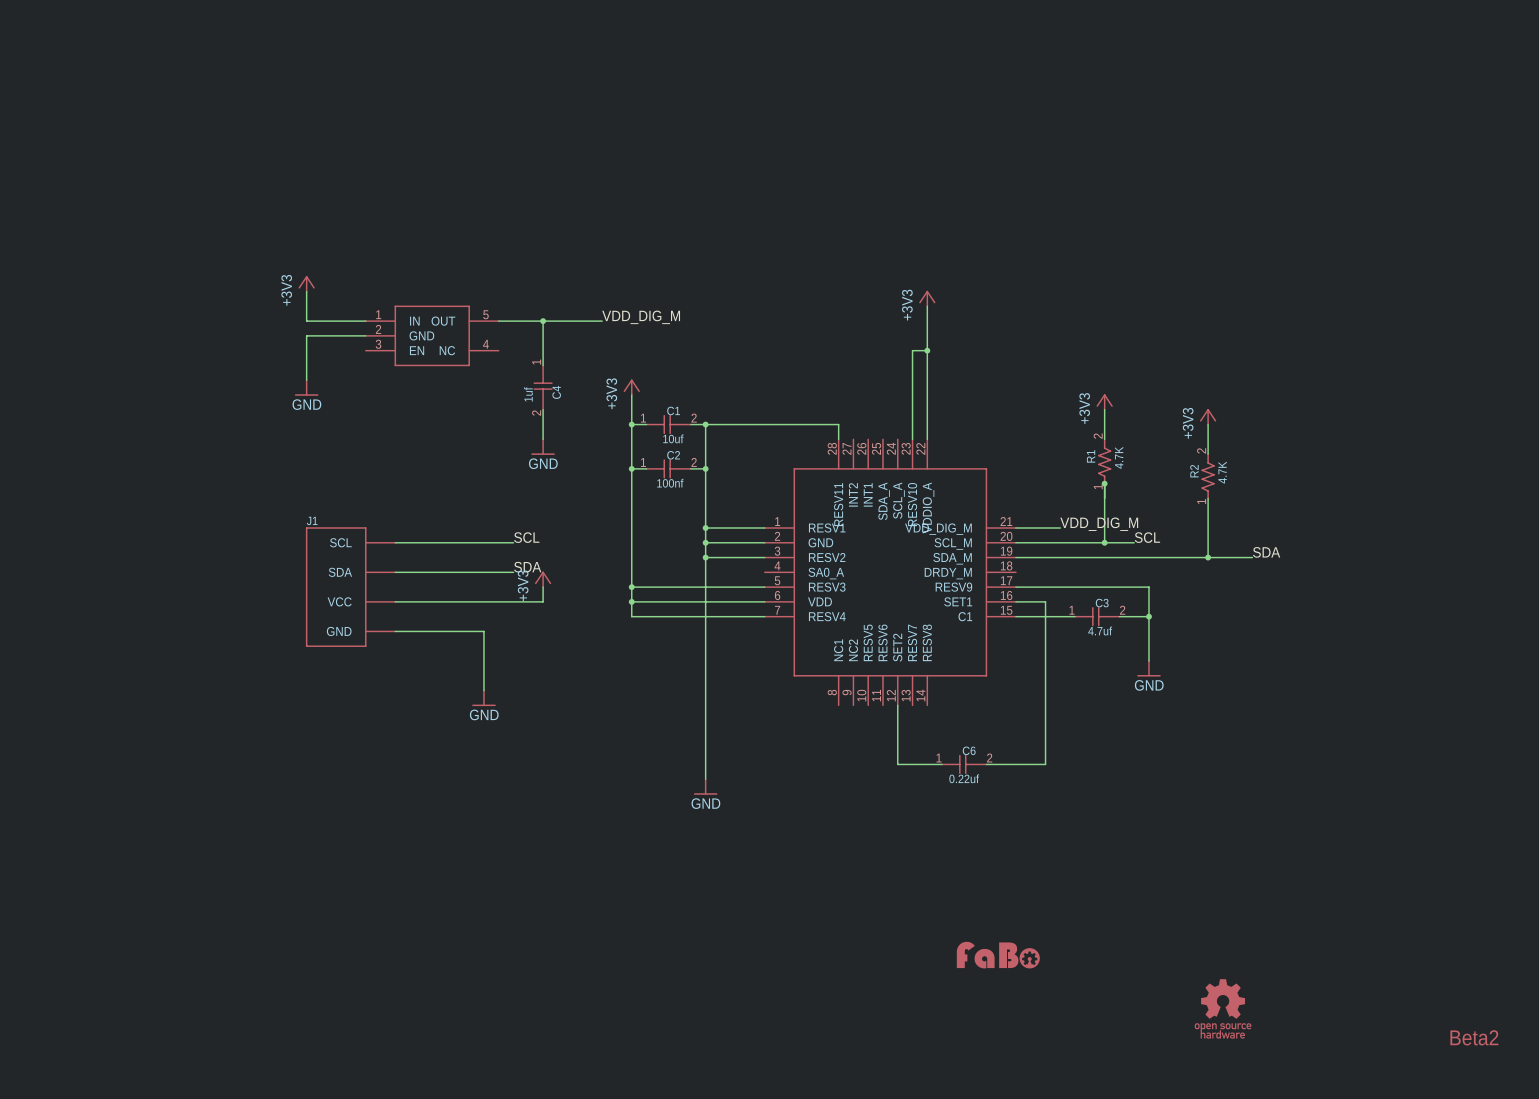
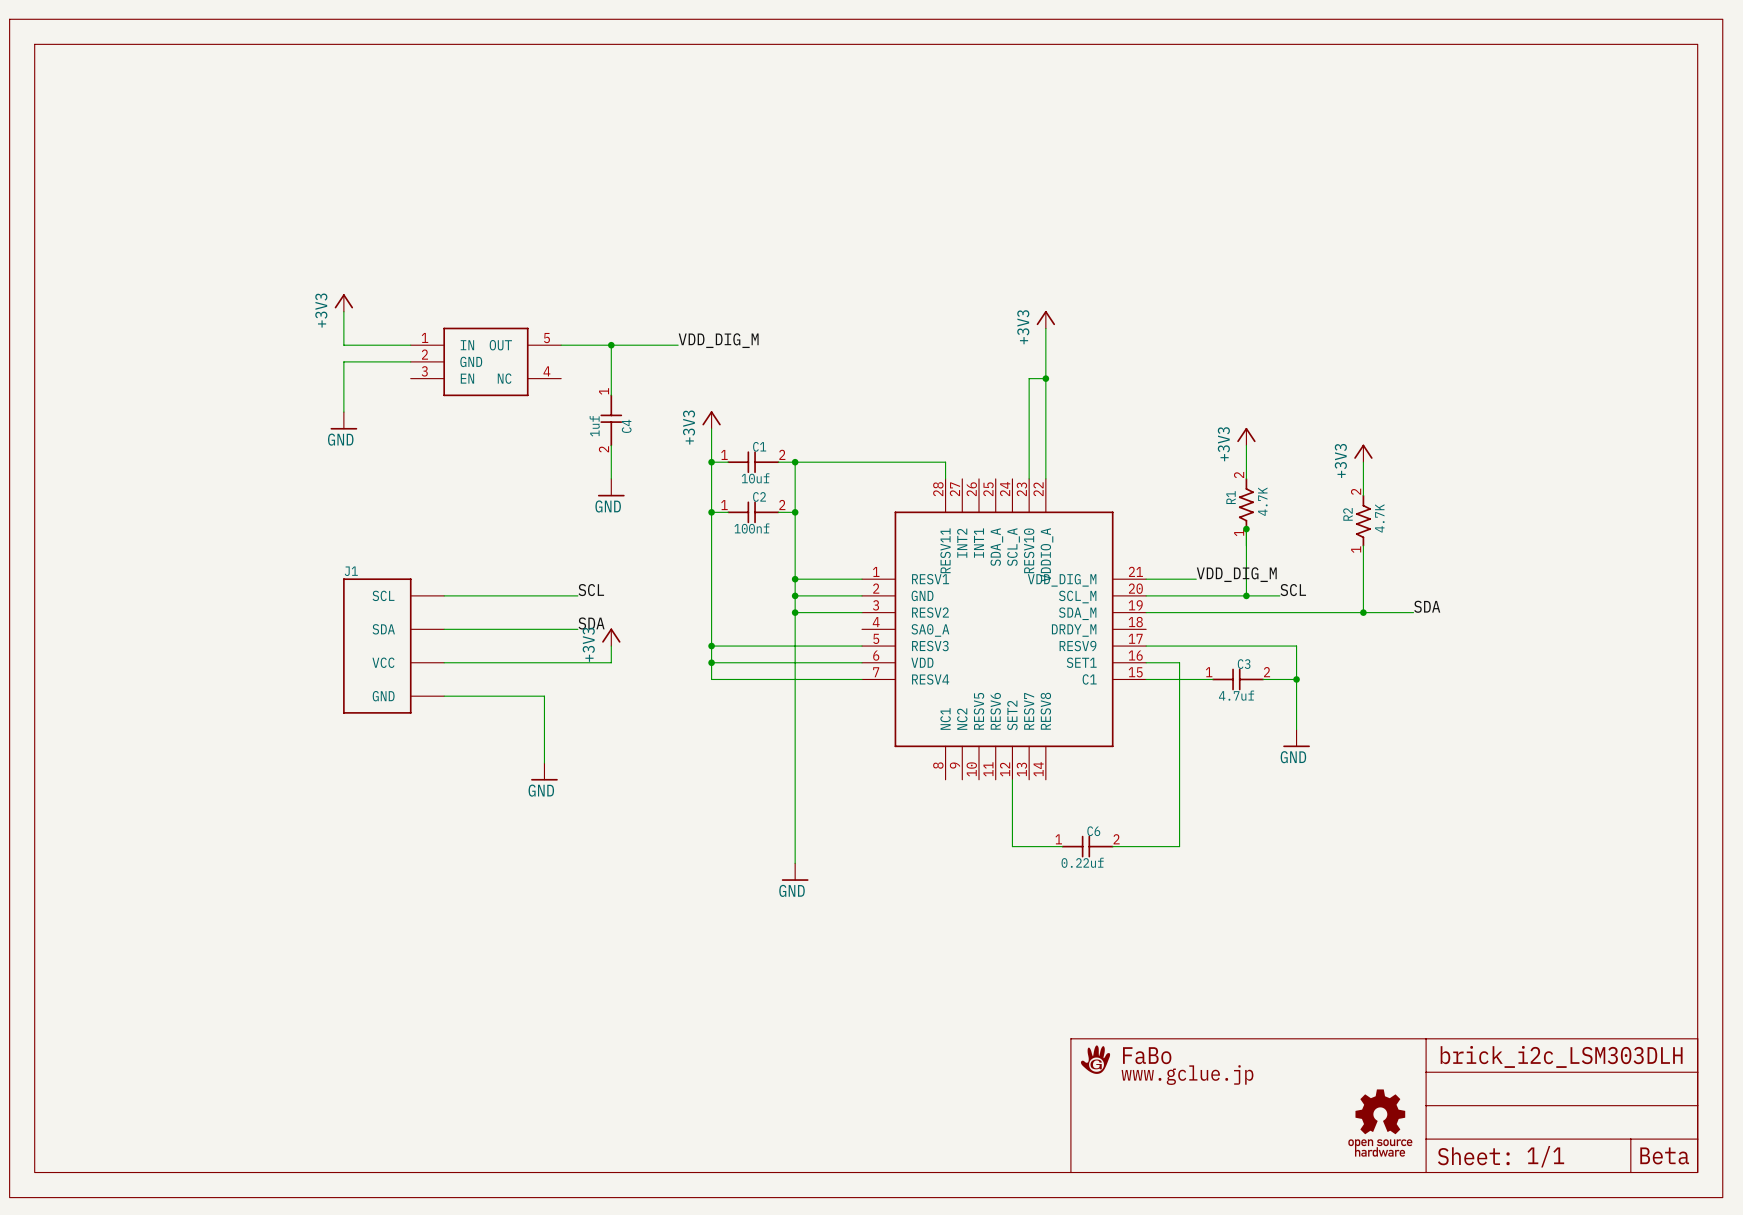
part: none -> (866, 608)
part: (998, 955) -> none
text: Beta2 (1474, 1037) -> Beta (1664, 1155)

